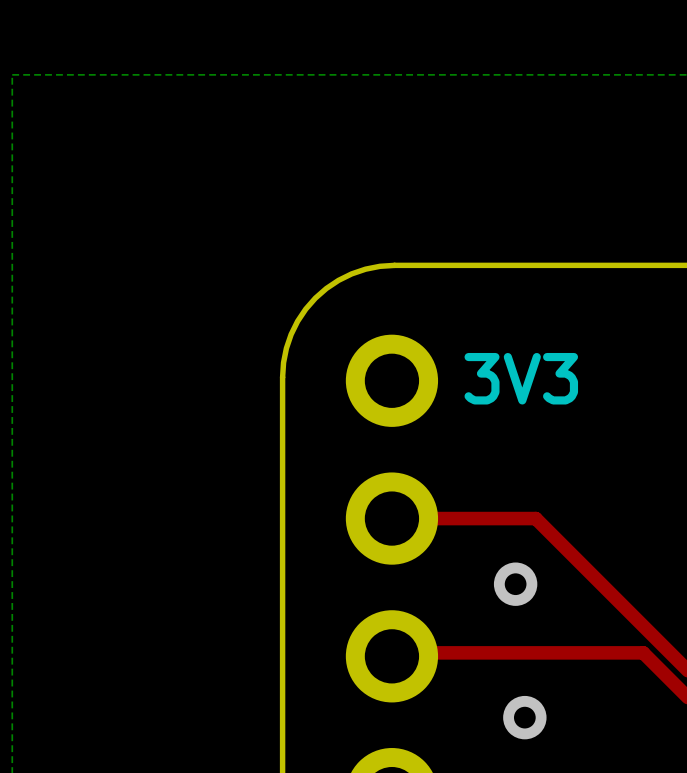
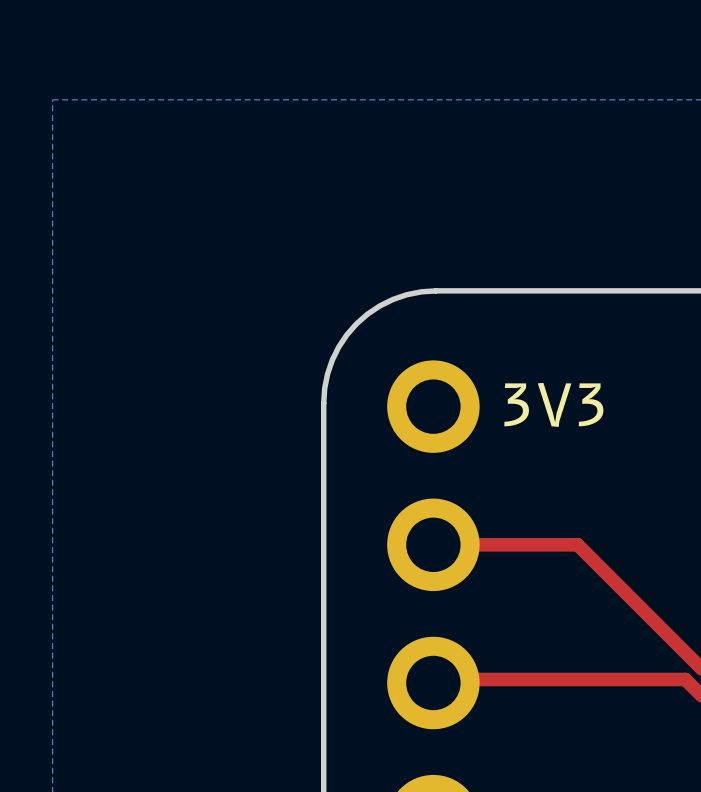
via: (515, 584) -> none
via: (524, 717) -> none

